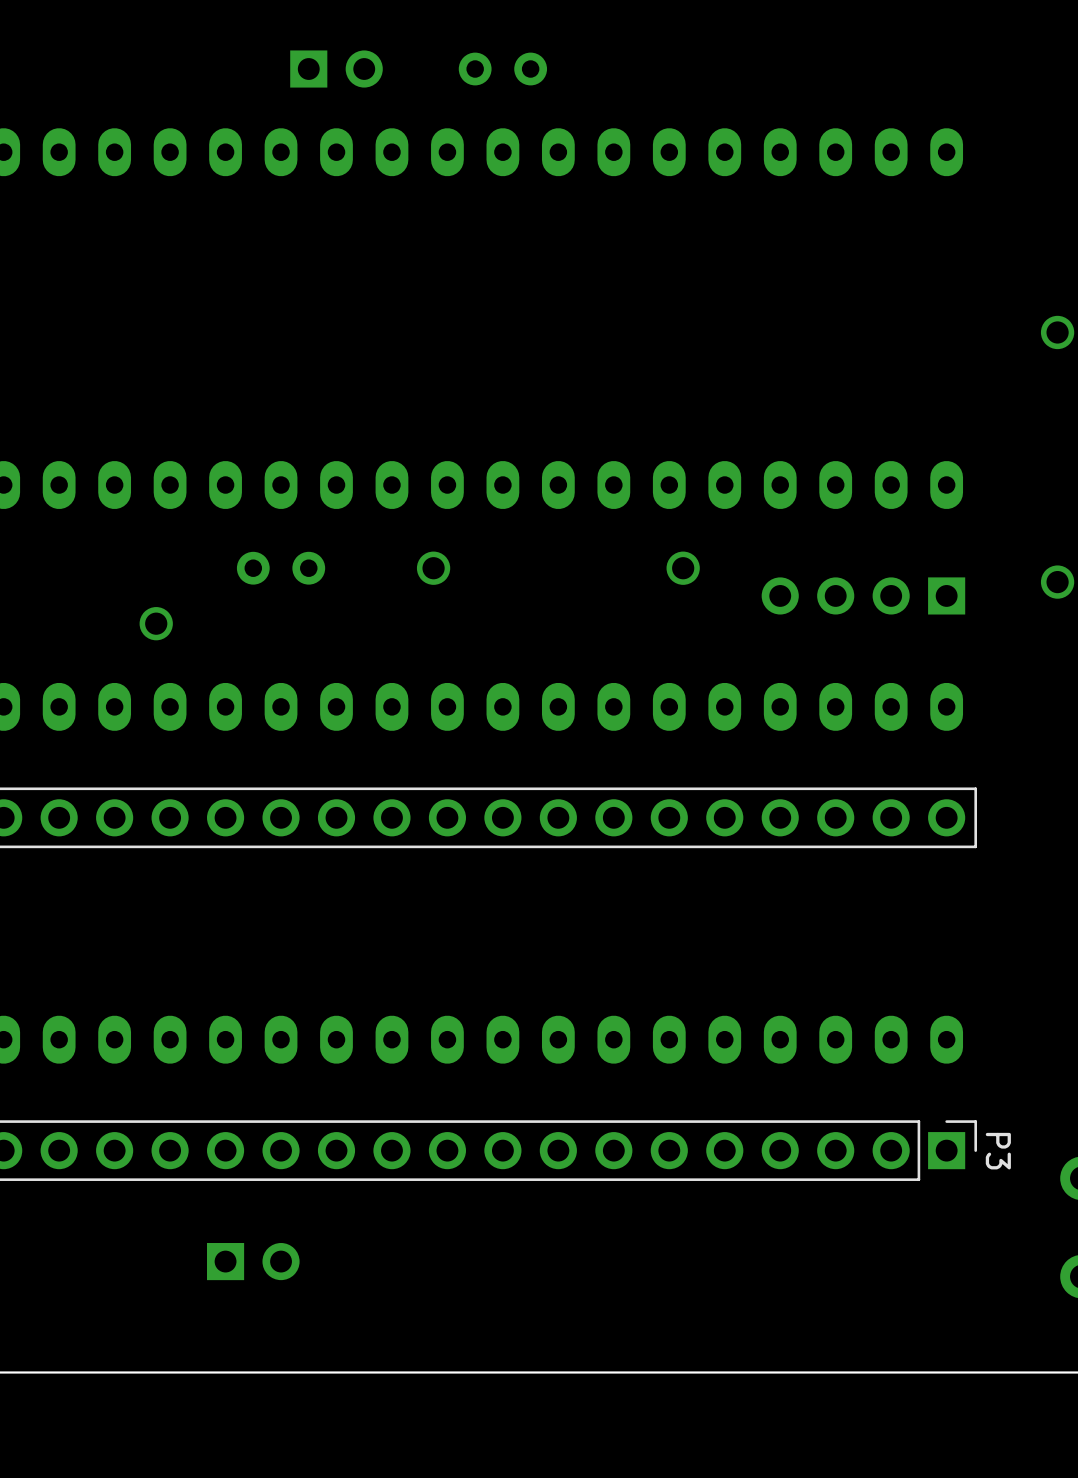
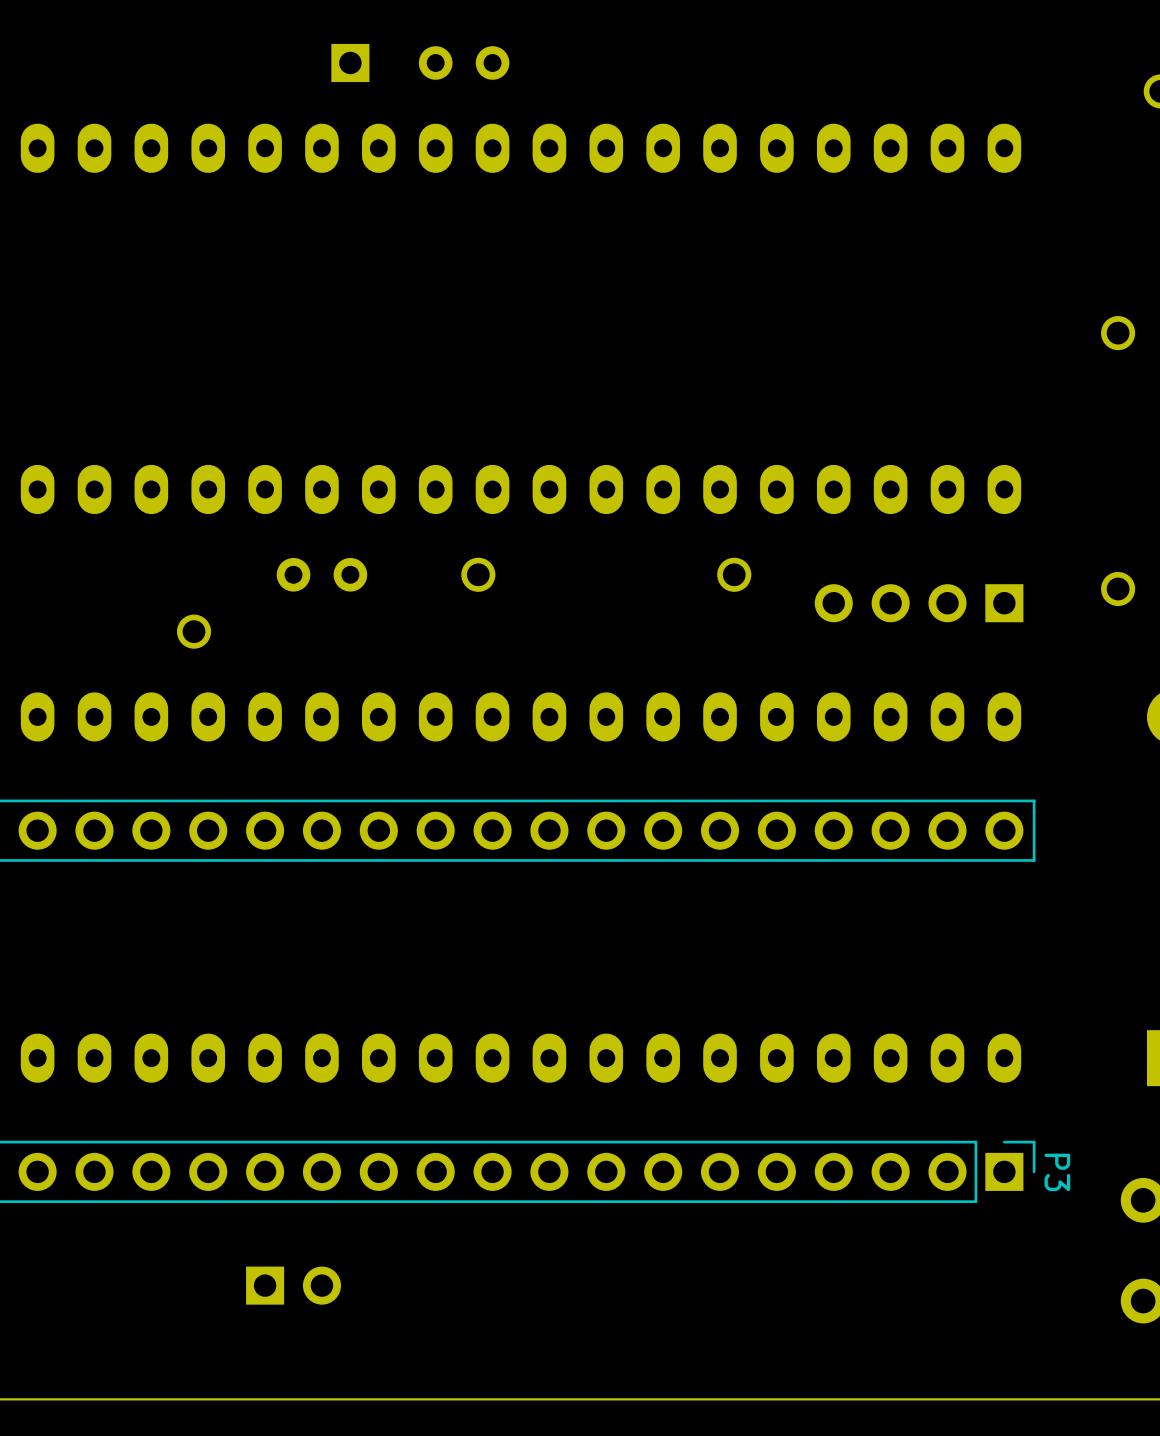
part: (336, 69) -> none
part position: (502, 69) -> (464, 62)

